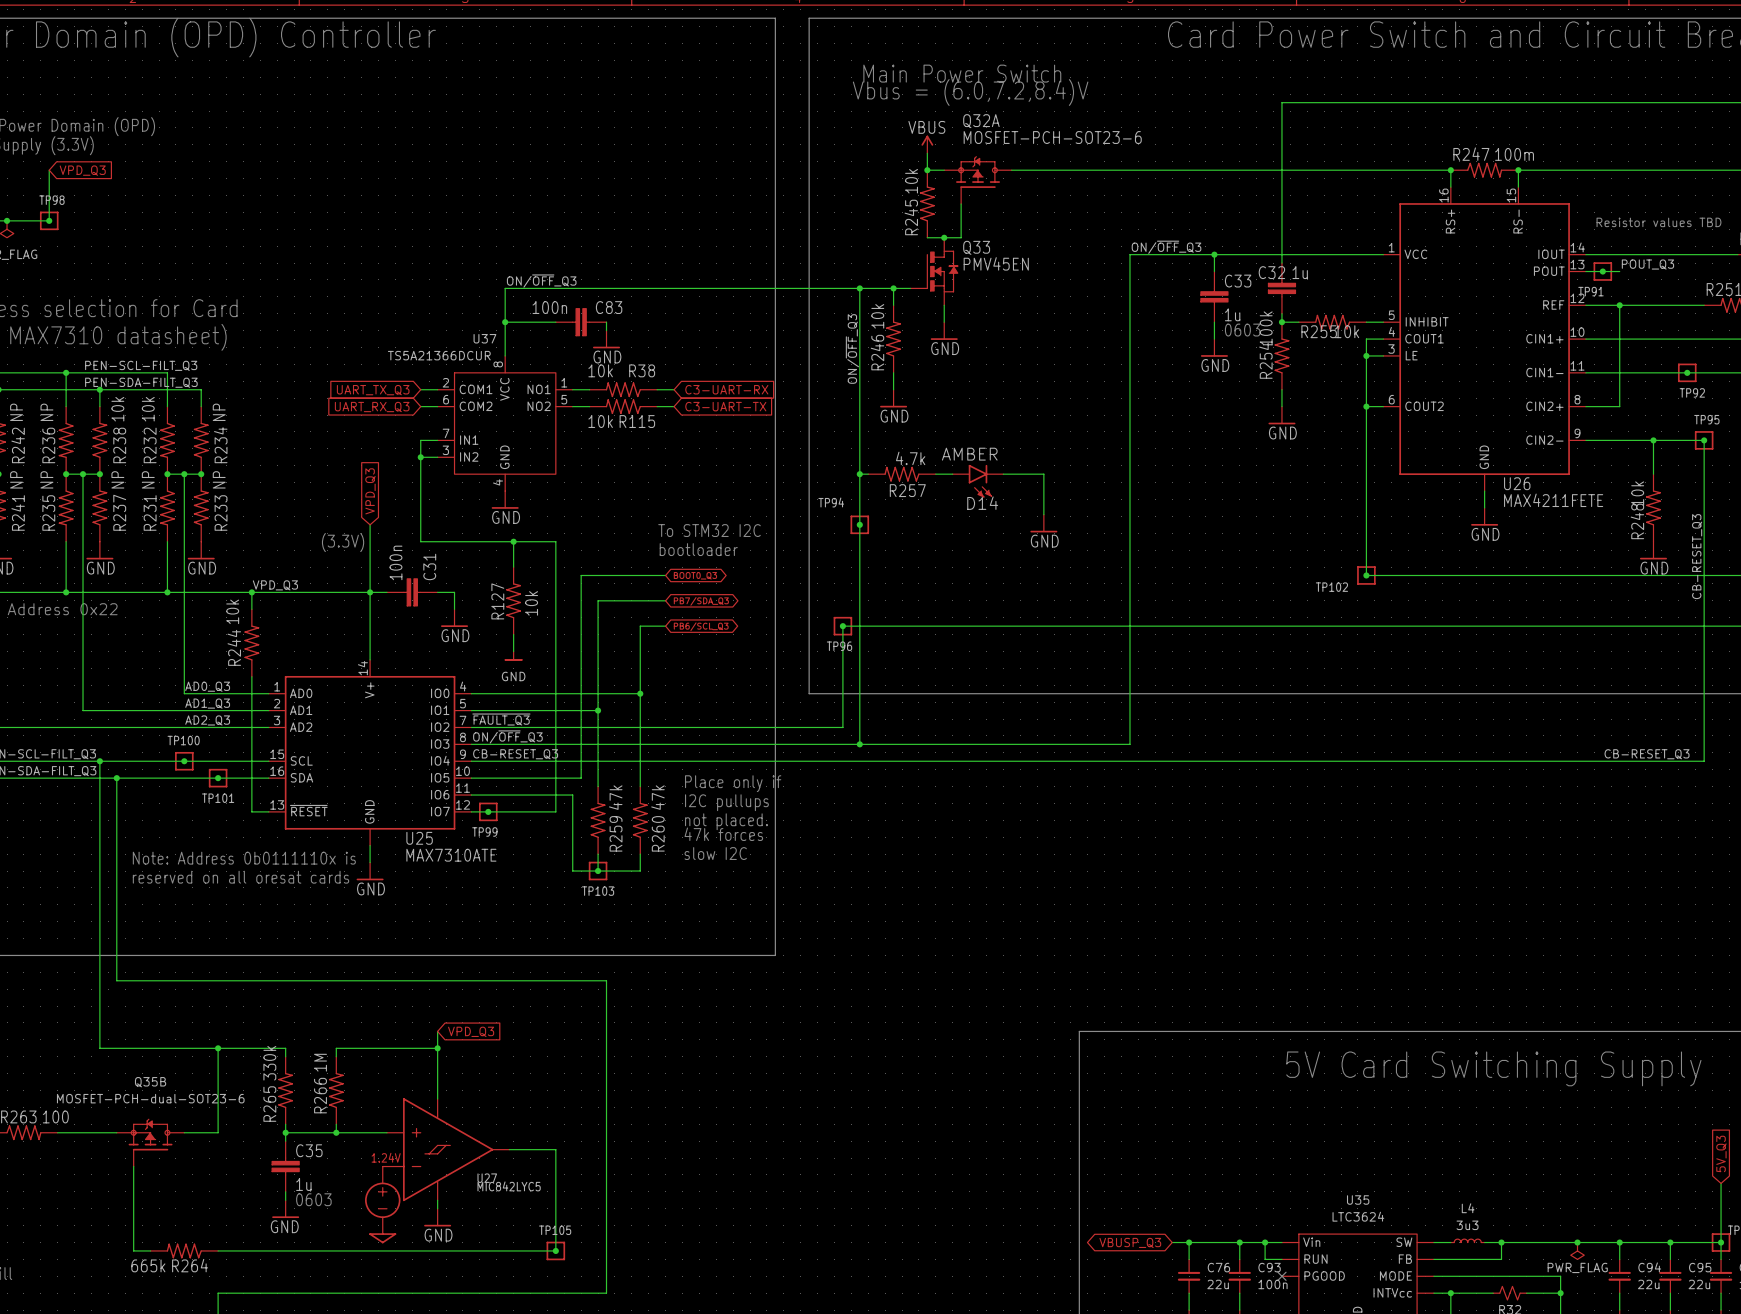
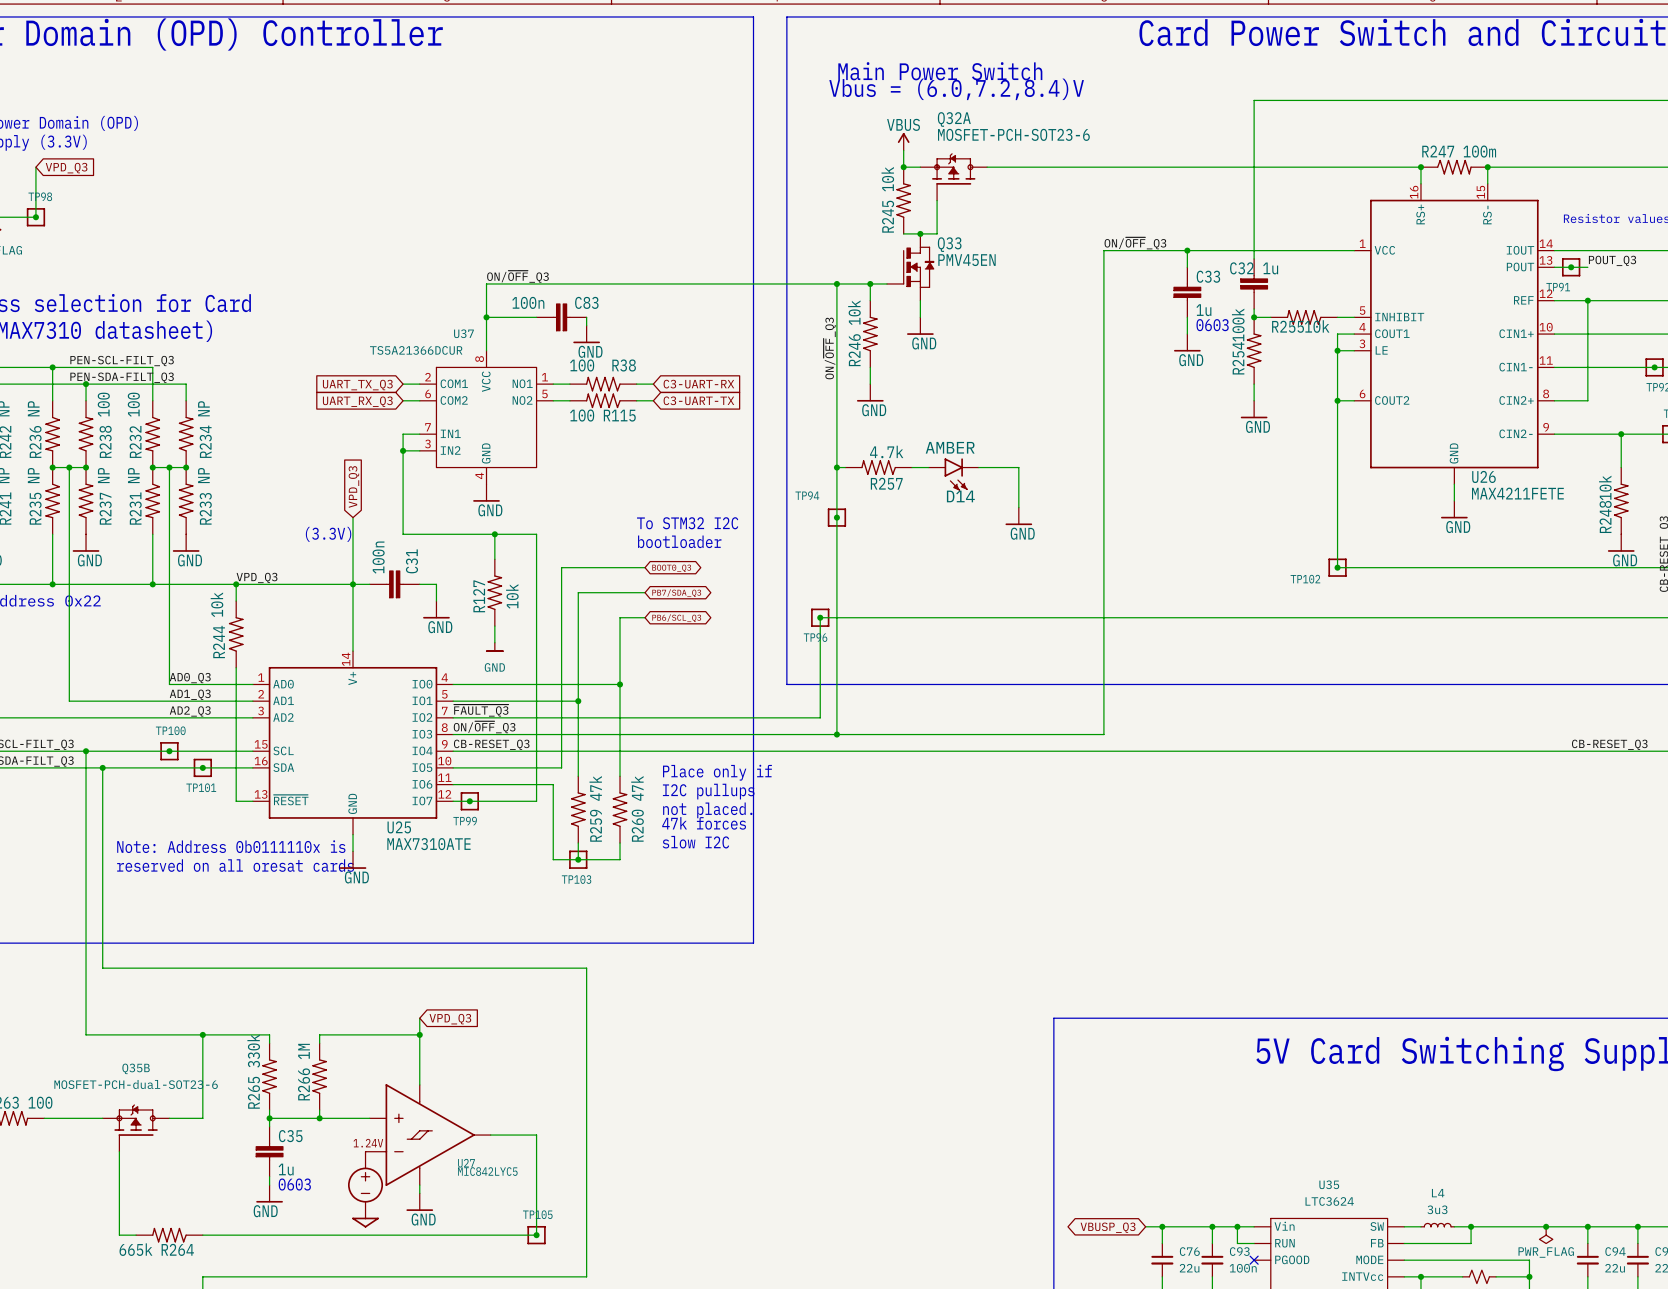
R38 value: 10k (600, 370) -> 100 (582, 365)
R238 value: 10k (117, 409) -> 100 (103, 404)
R232 value: 10k (148, 409) -> 100 (133, 404)
R115 value: 10k (600, 421) -> 100 (582, 415)

